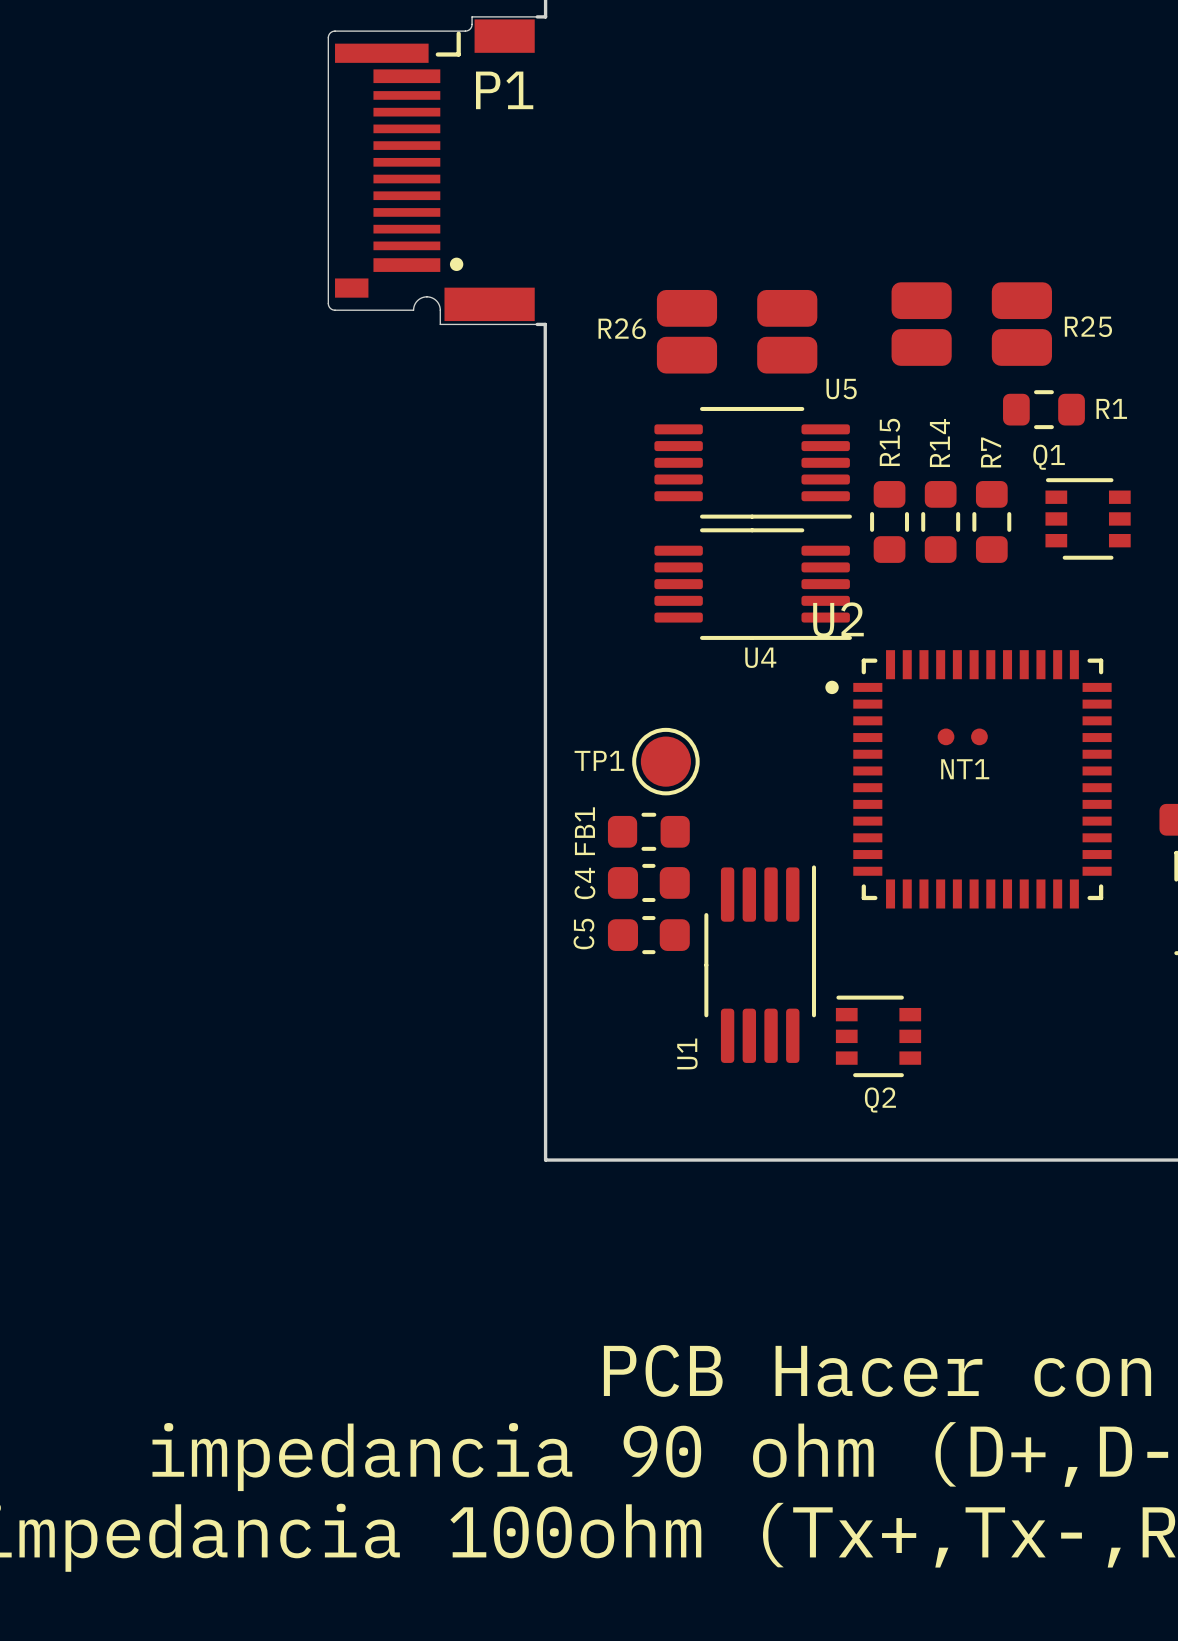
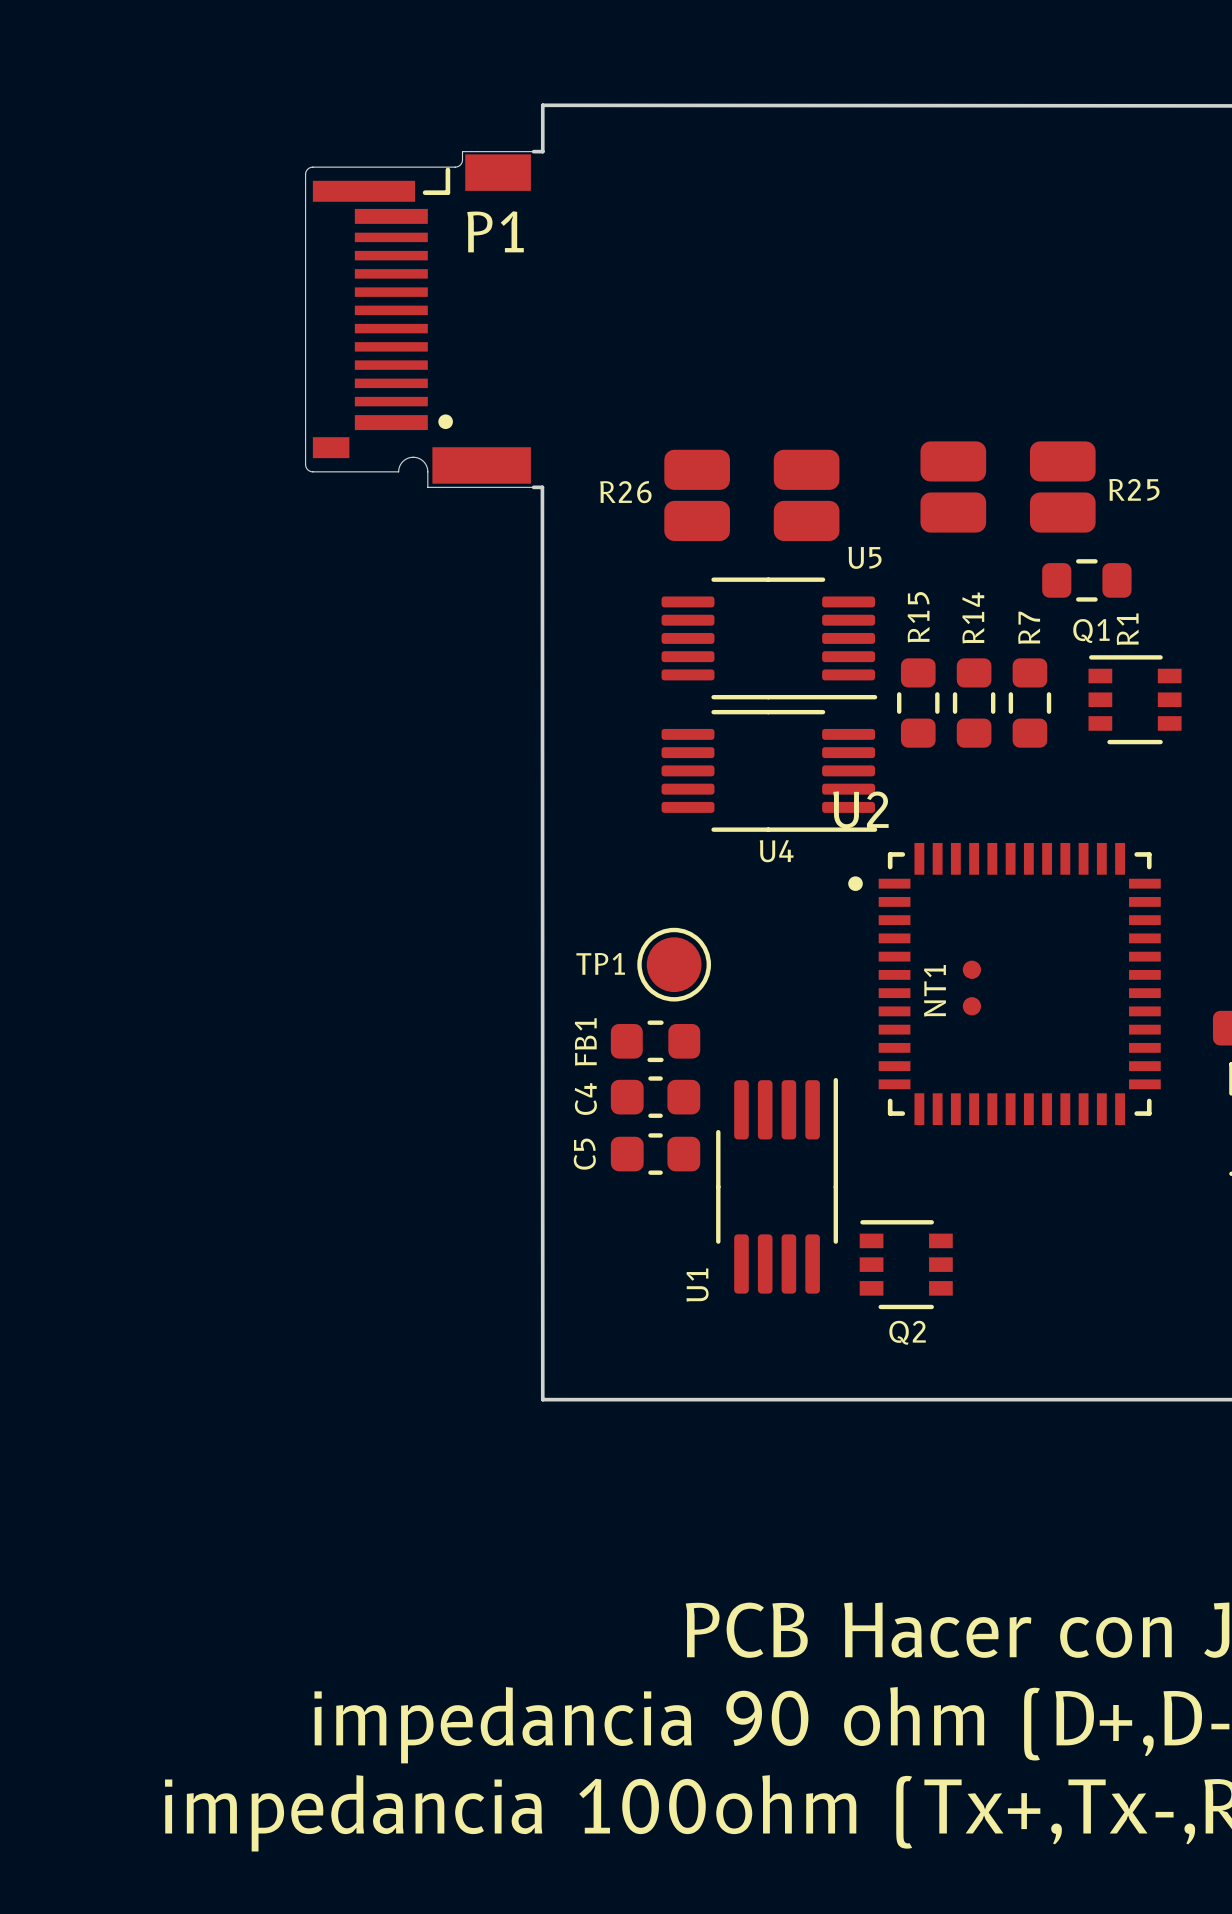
R1 name rotation: 0° (1111, 408) -> 90° counterclockwise (1127, 629)
R1 name position: R1 (1111, 408) -> R1 (1127, 629)
NT1 rotation: 0° (962, 736) -> 90° clockwise (971, 988)
NT1 position: (962, 736) -> (971, 988)

